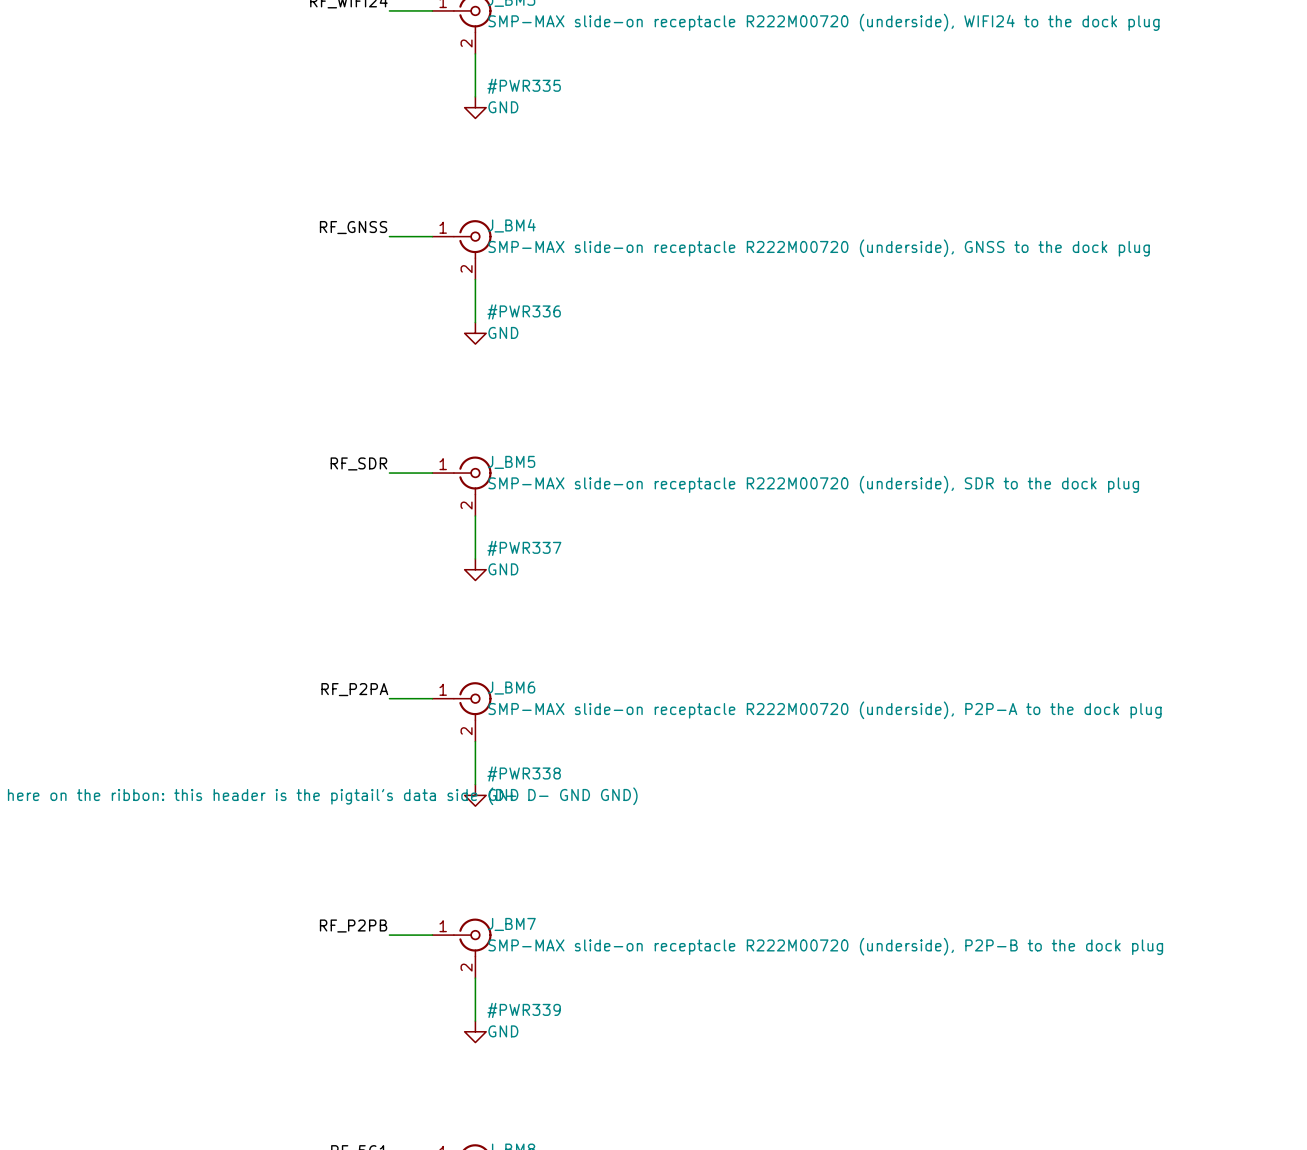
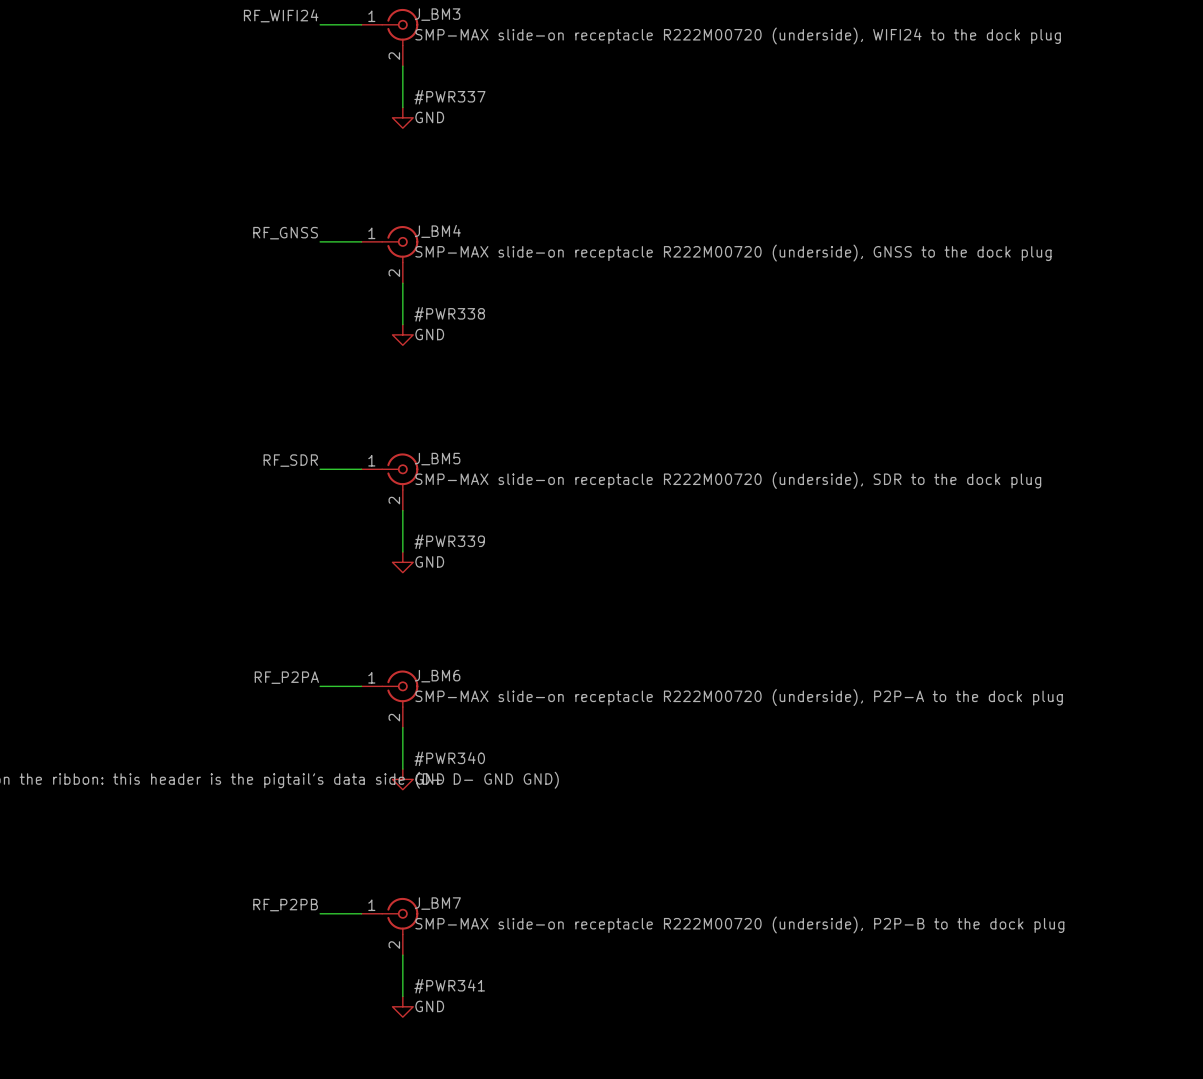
#PWR335 name: #PWR335 (524, 86) -> #PWR337 (449, 97)
#PWR336 name: #PWR336 (524, 311) -> #PWR338 (449, 314)
#PWR337 name: #PWR337 (524, 548) -> #PWR339 (449, 541)
#PWR338 name: #PWR338 (524, 774) -> #PWR340 (449, 758)
#PWR339 name: #PWR339 (524, 1010) -> #PWR341 (449, 986)

